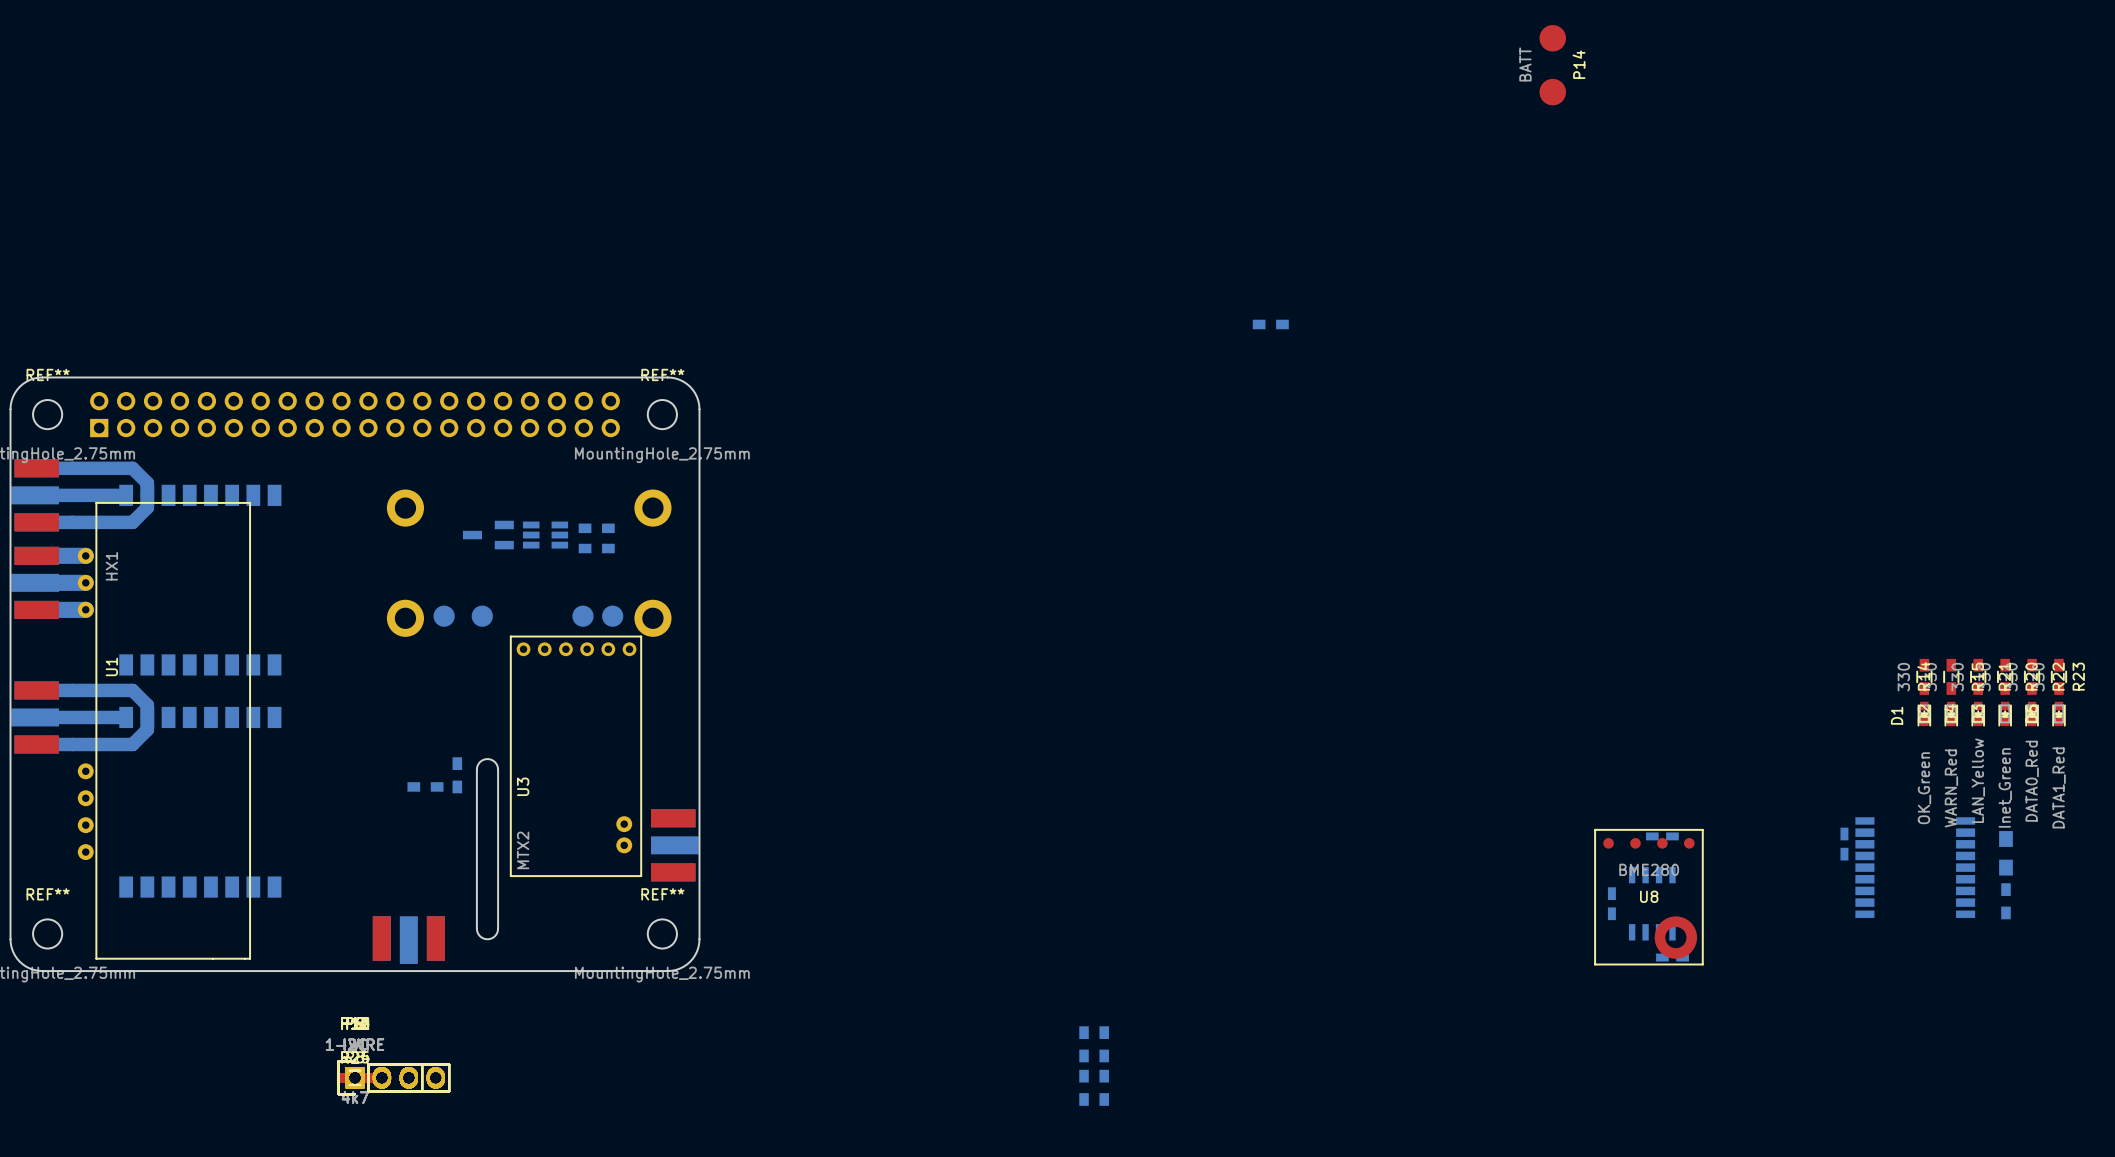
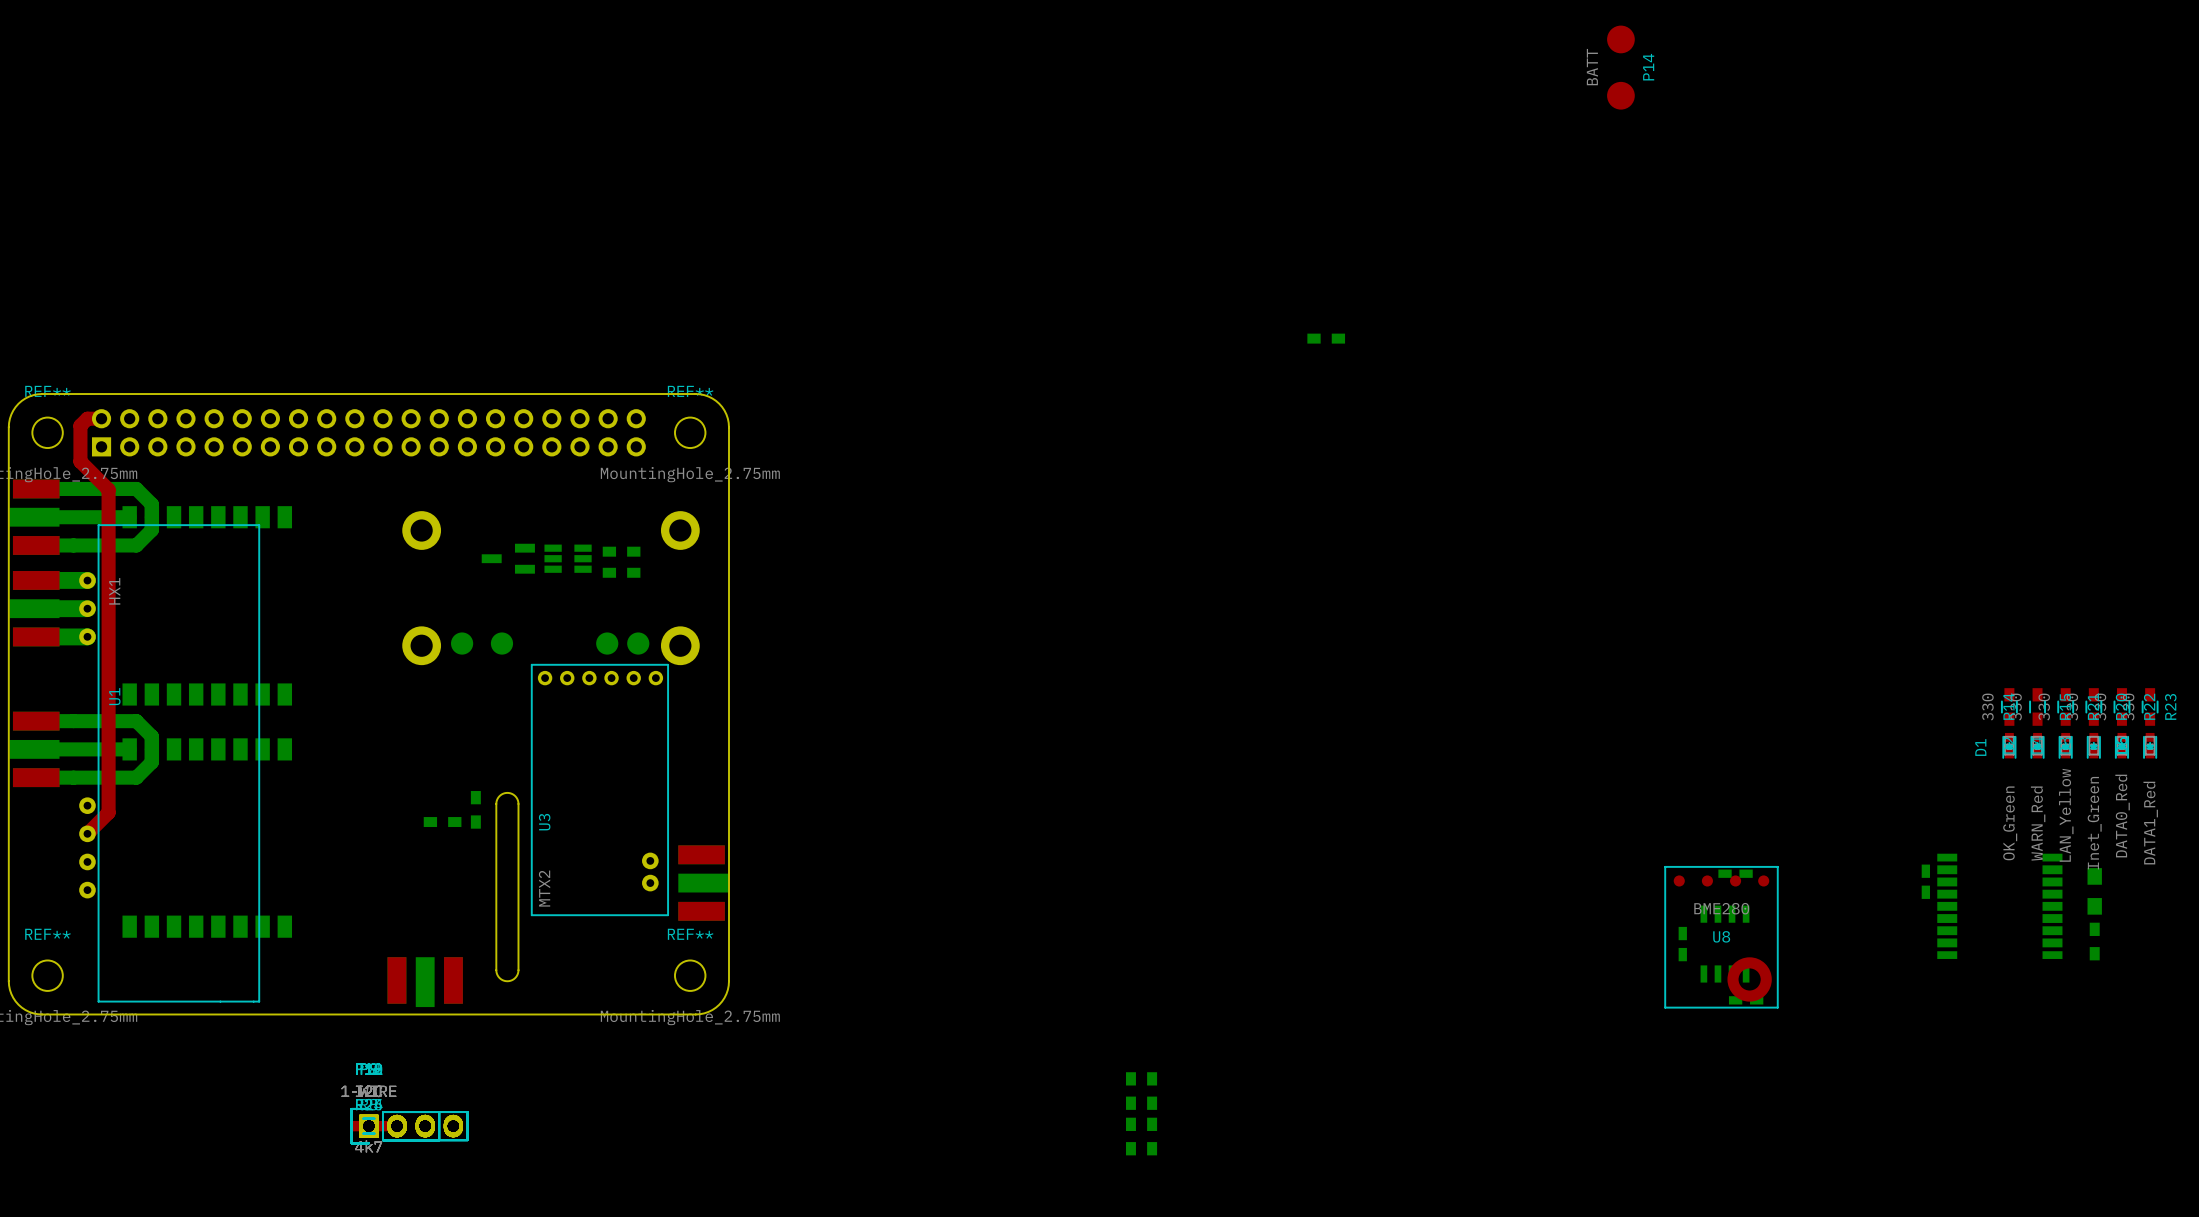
top track: none -> (101, 418) (87, 418) (80, 425) (80, 461) (108, 489) (108, 812) (87, 833)

